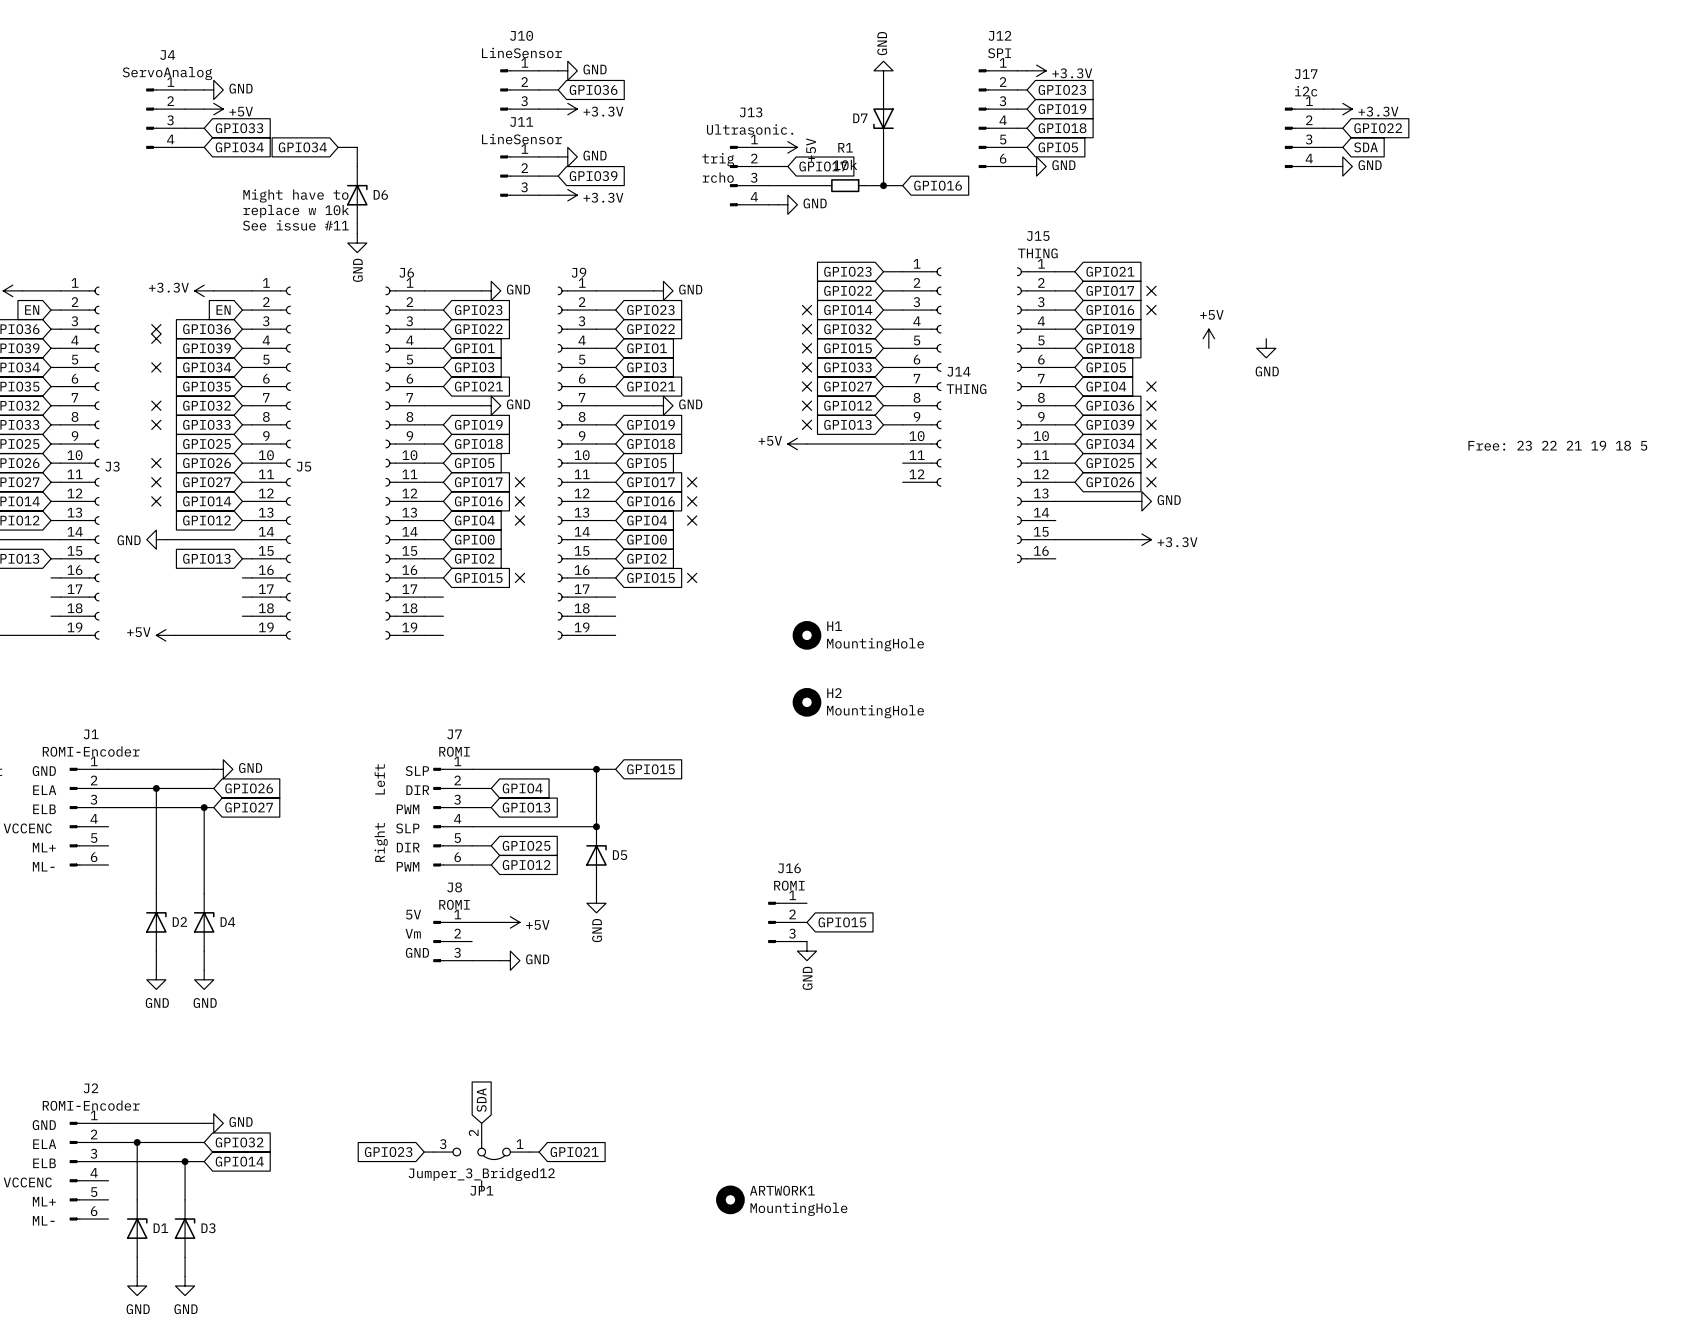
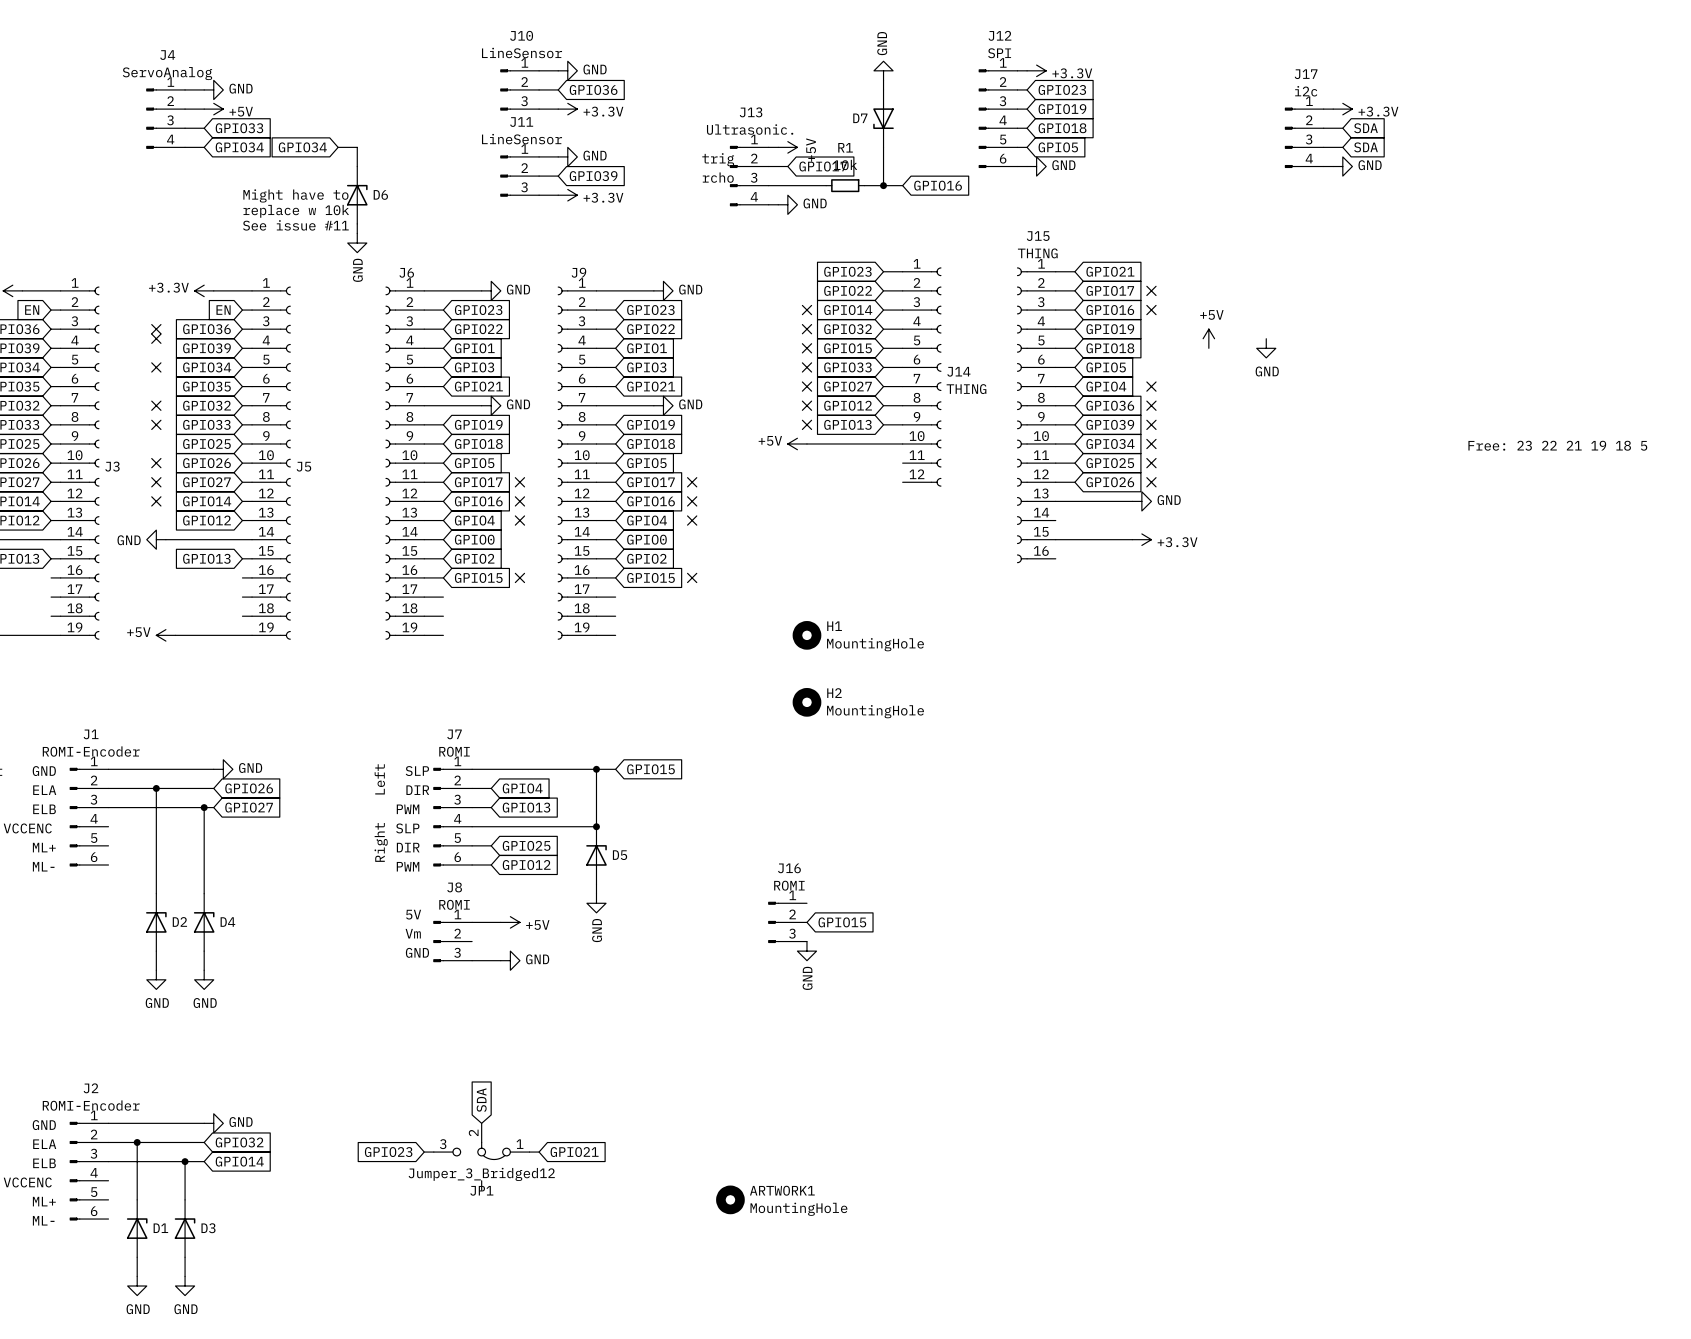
global label: GPIO22 (1378, 128) -> SDA (1366, 128)

